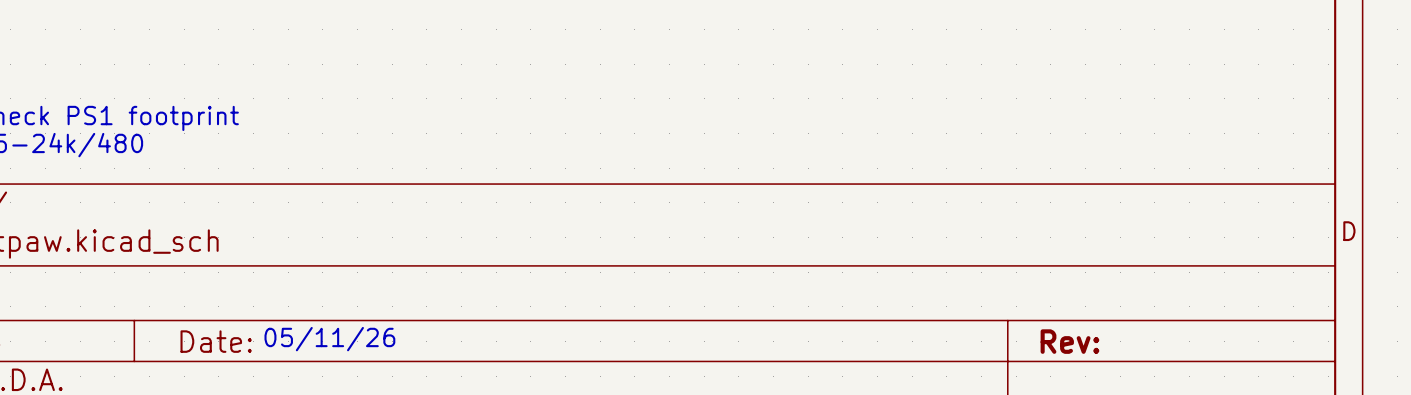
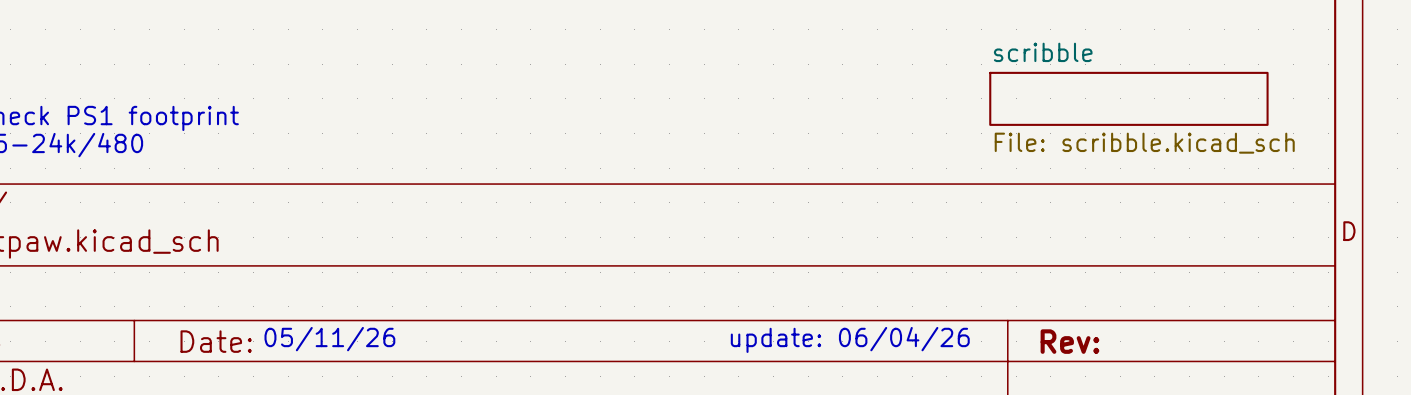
sheet scribble: none -> File: scribble.kicad_sch (1128, 98)
text: none -> update: 06/04/26 (850, 339)

